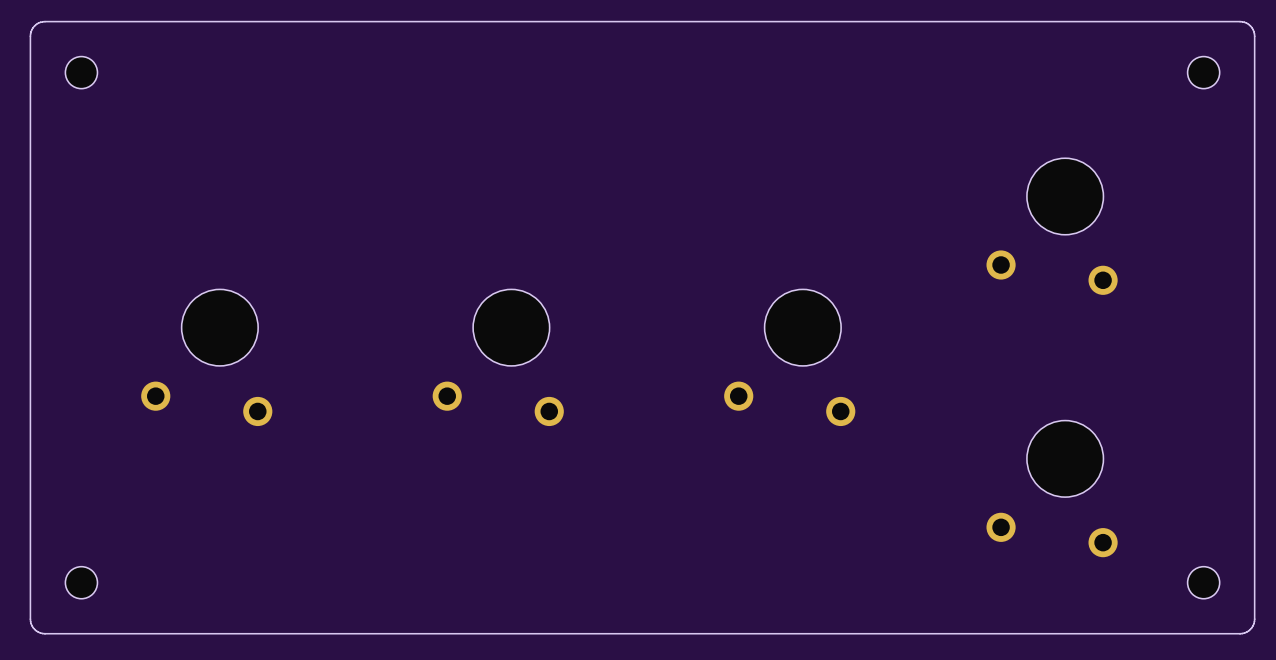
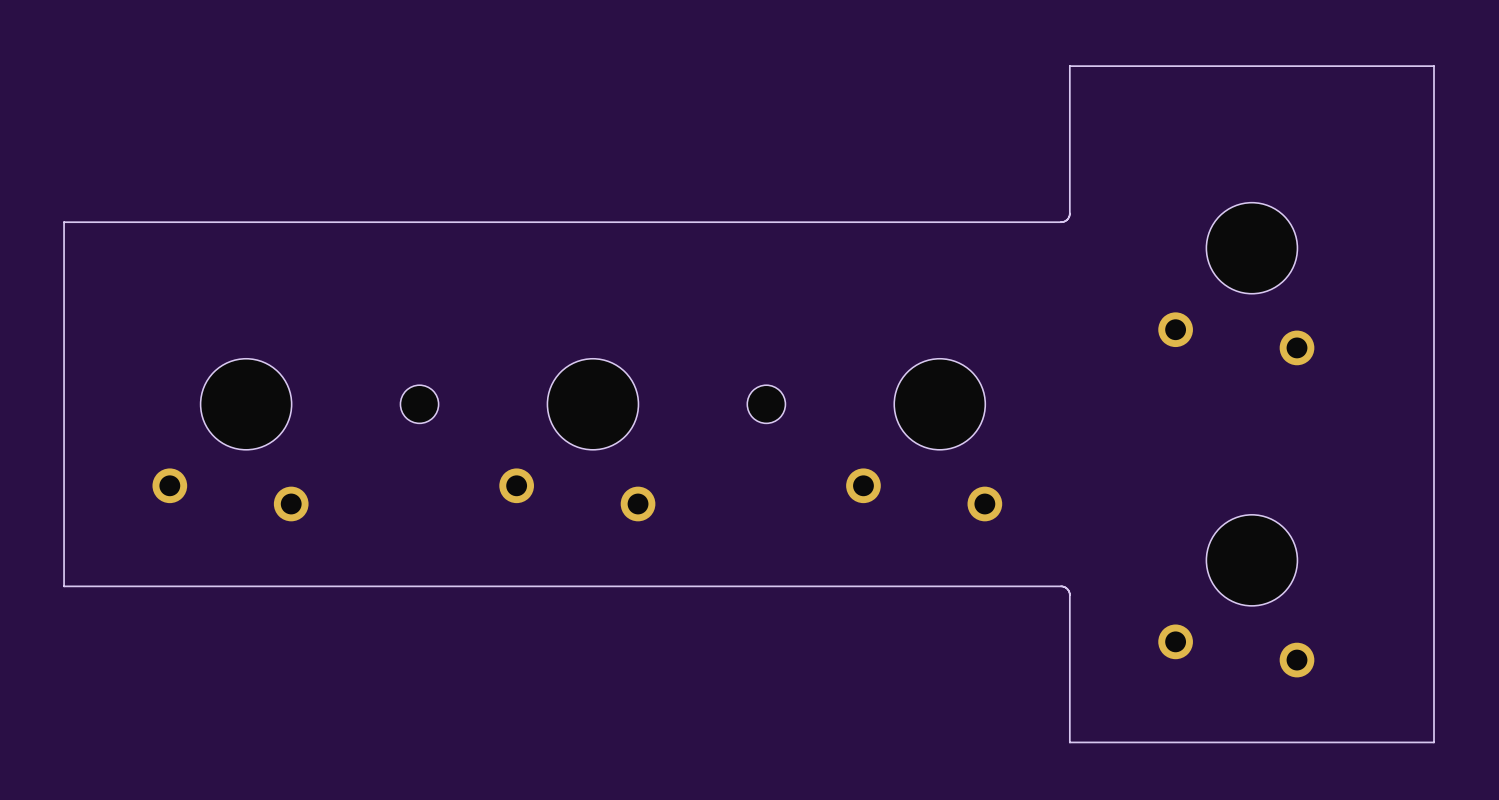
board edge: (44, 21) (34, 25) (30, 36) (30, 619) (32, 625) (38, 632) (44, 633) (1240, 633) (1248, 630) (1253, 625) (1254, 619) (1254, 36) (1253, 29) (1246, 23) (1240, 21) (44, 21) -> (1069, 66) (1069, 213) (1068, 218) (1062, 222) (64, 222) (64, 586) (1062, 586) (1068, 589) (1069, 595) (1069, 742) (1433, 742) (1433, 66) (1069, 66)
part: (81, 72) -> none
part: (1203, 72) -> none
part: none -> (419, 404)
part: none -> (766, 404)
part: (81, 582) -> none
part: (1203, 582) -> none

